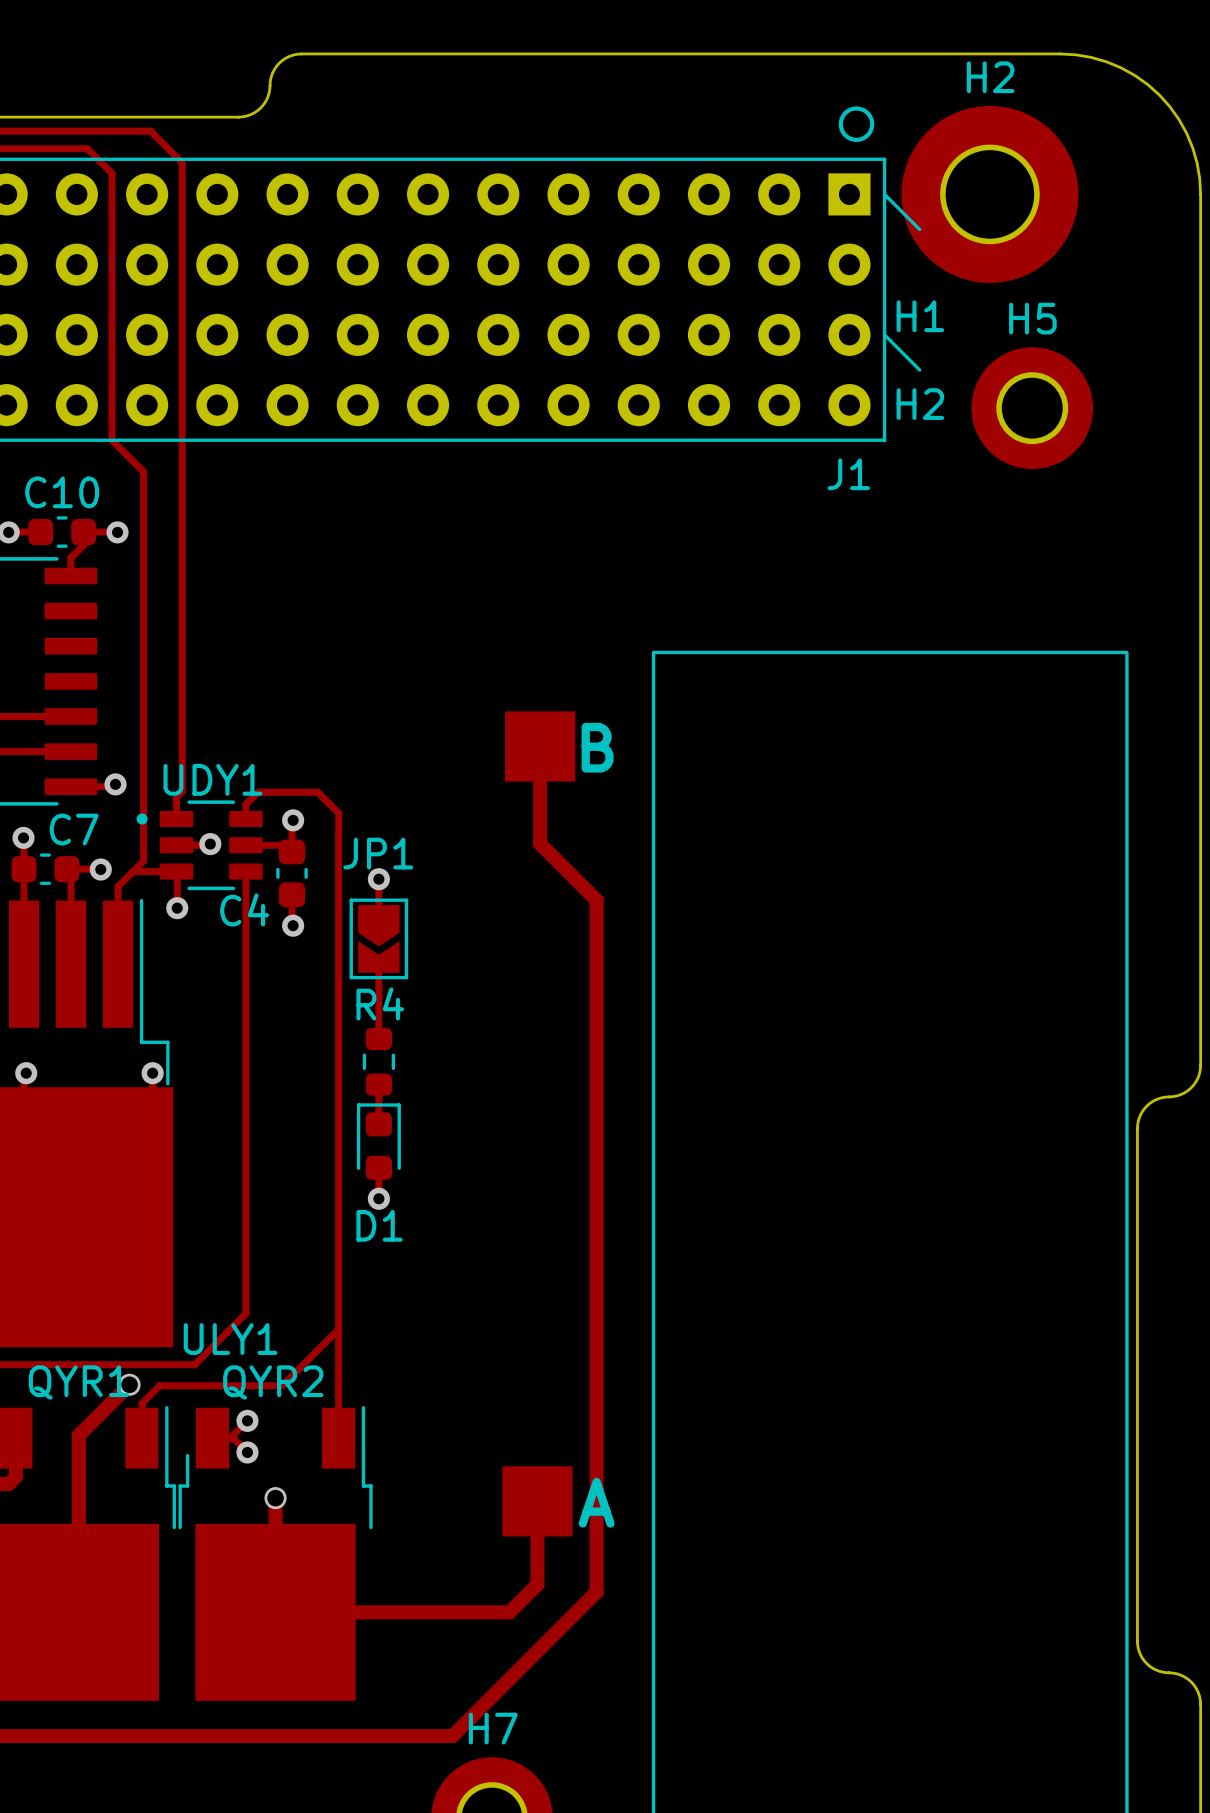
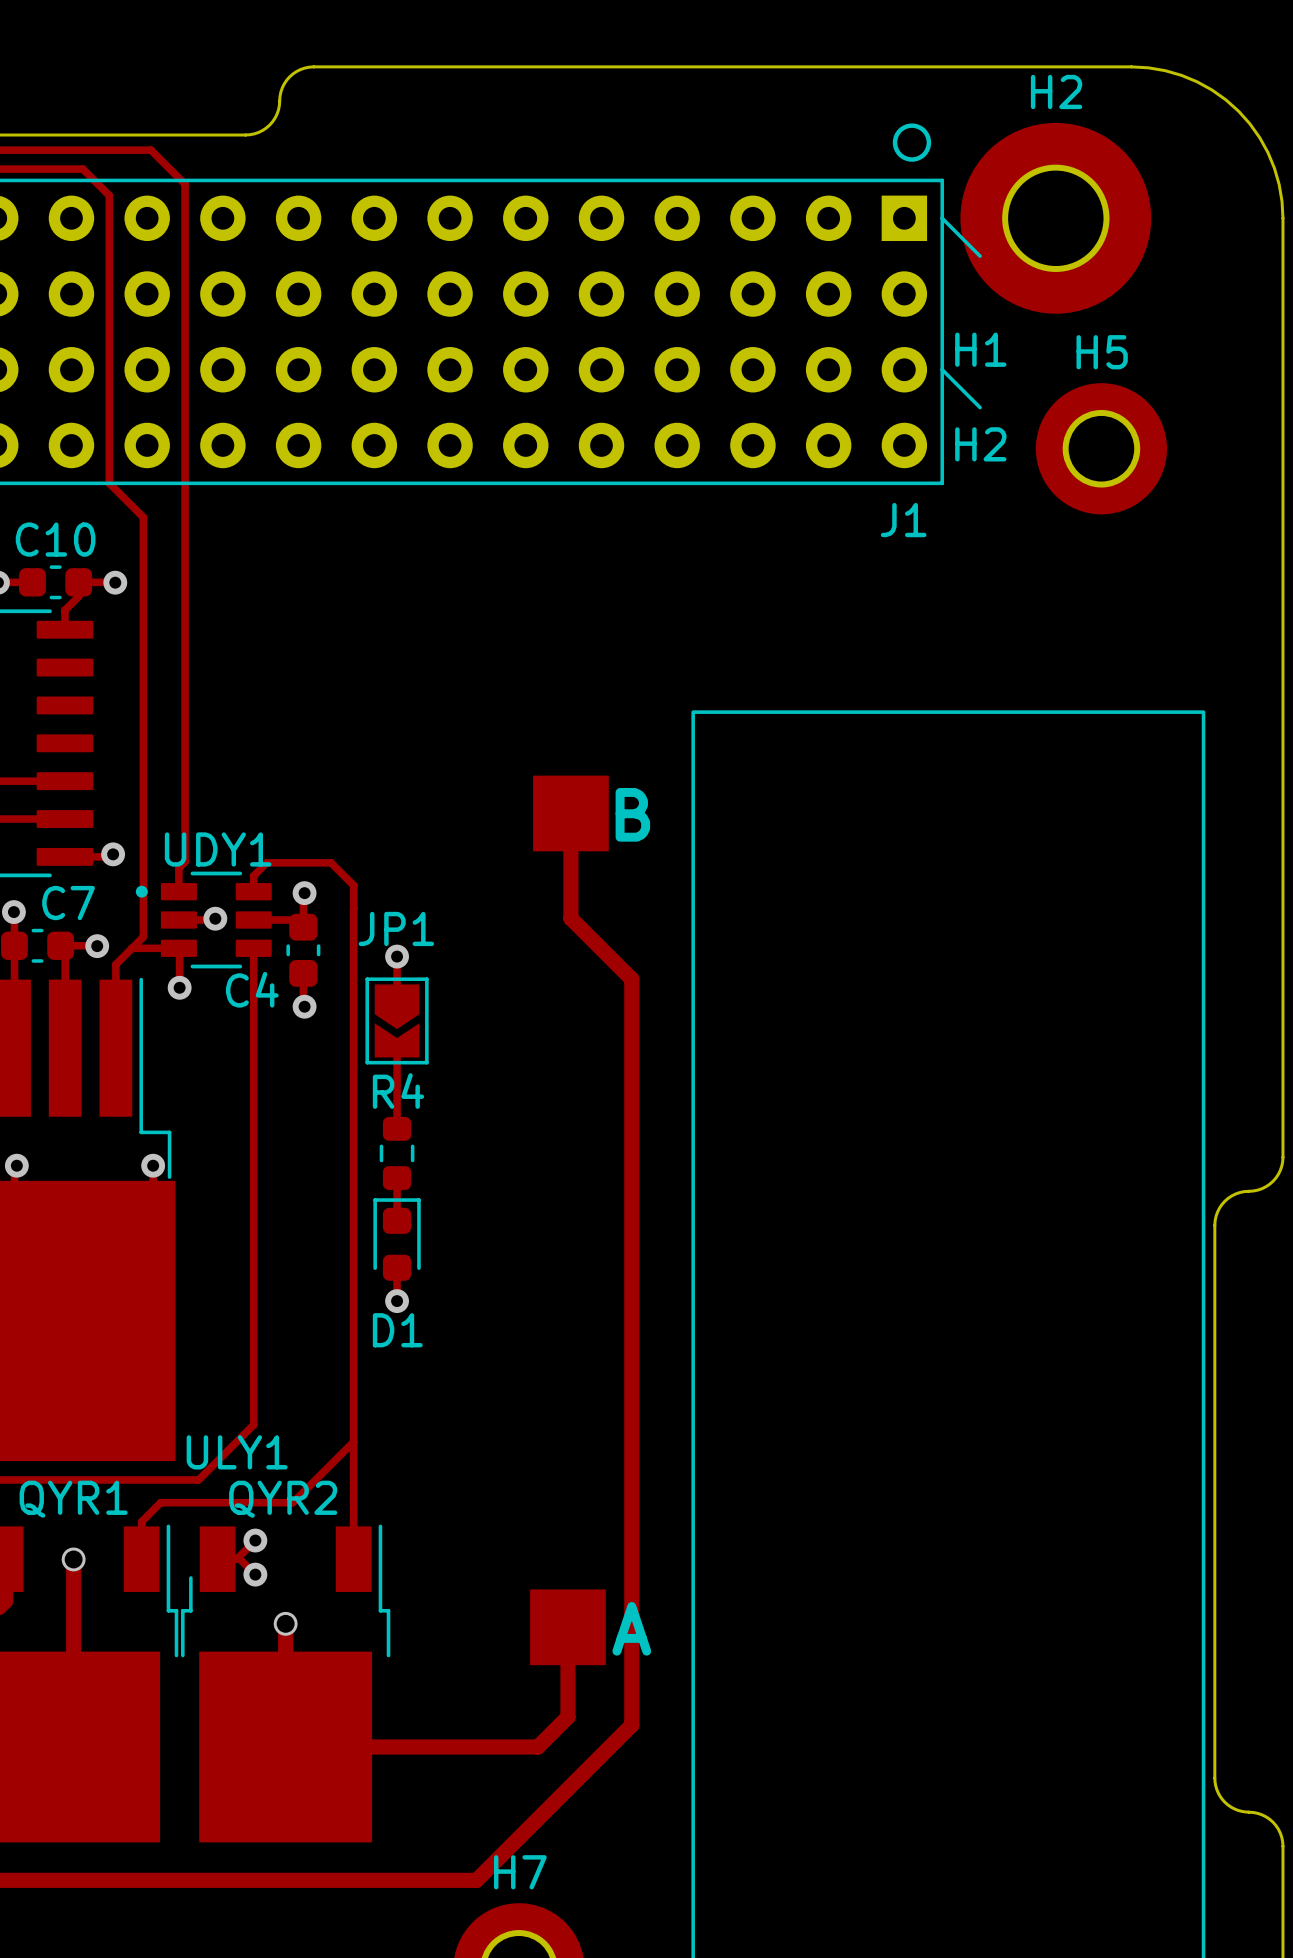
track: (129, 1384) (78, 1435) (78, 1438) -> none
via position: (129, 1384) -> (73, 1559)

